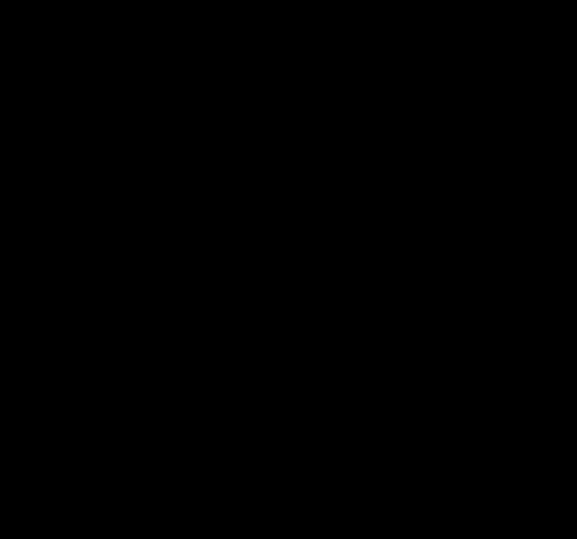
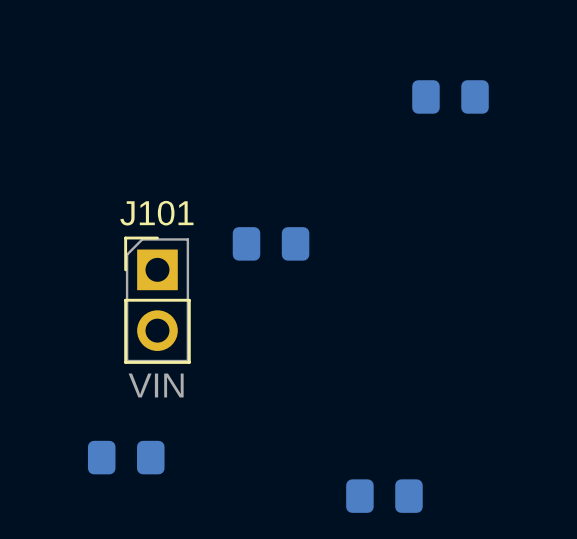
part: none -> (450, 96)
part: none -> (271, 243)
J101: none -> VIN (157, 300)
part: none -> (126, 457)
part: none -> (384, 496)

